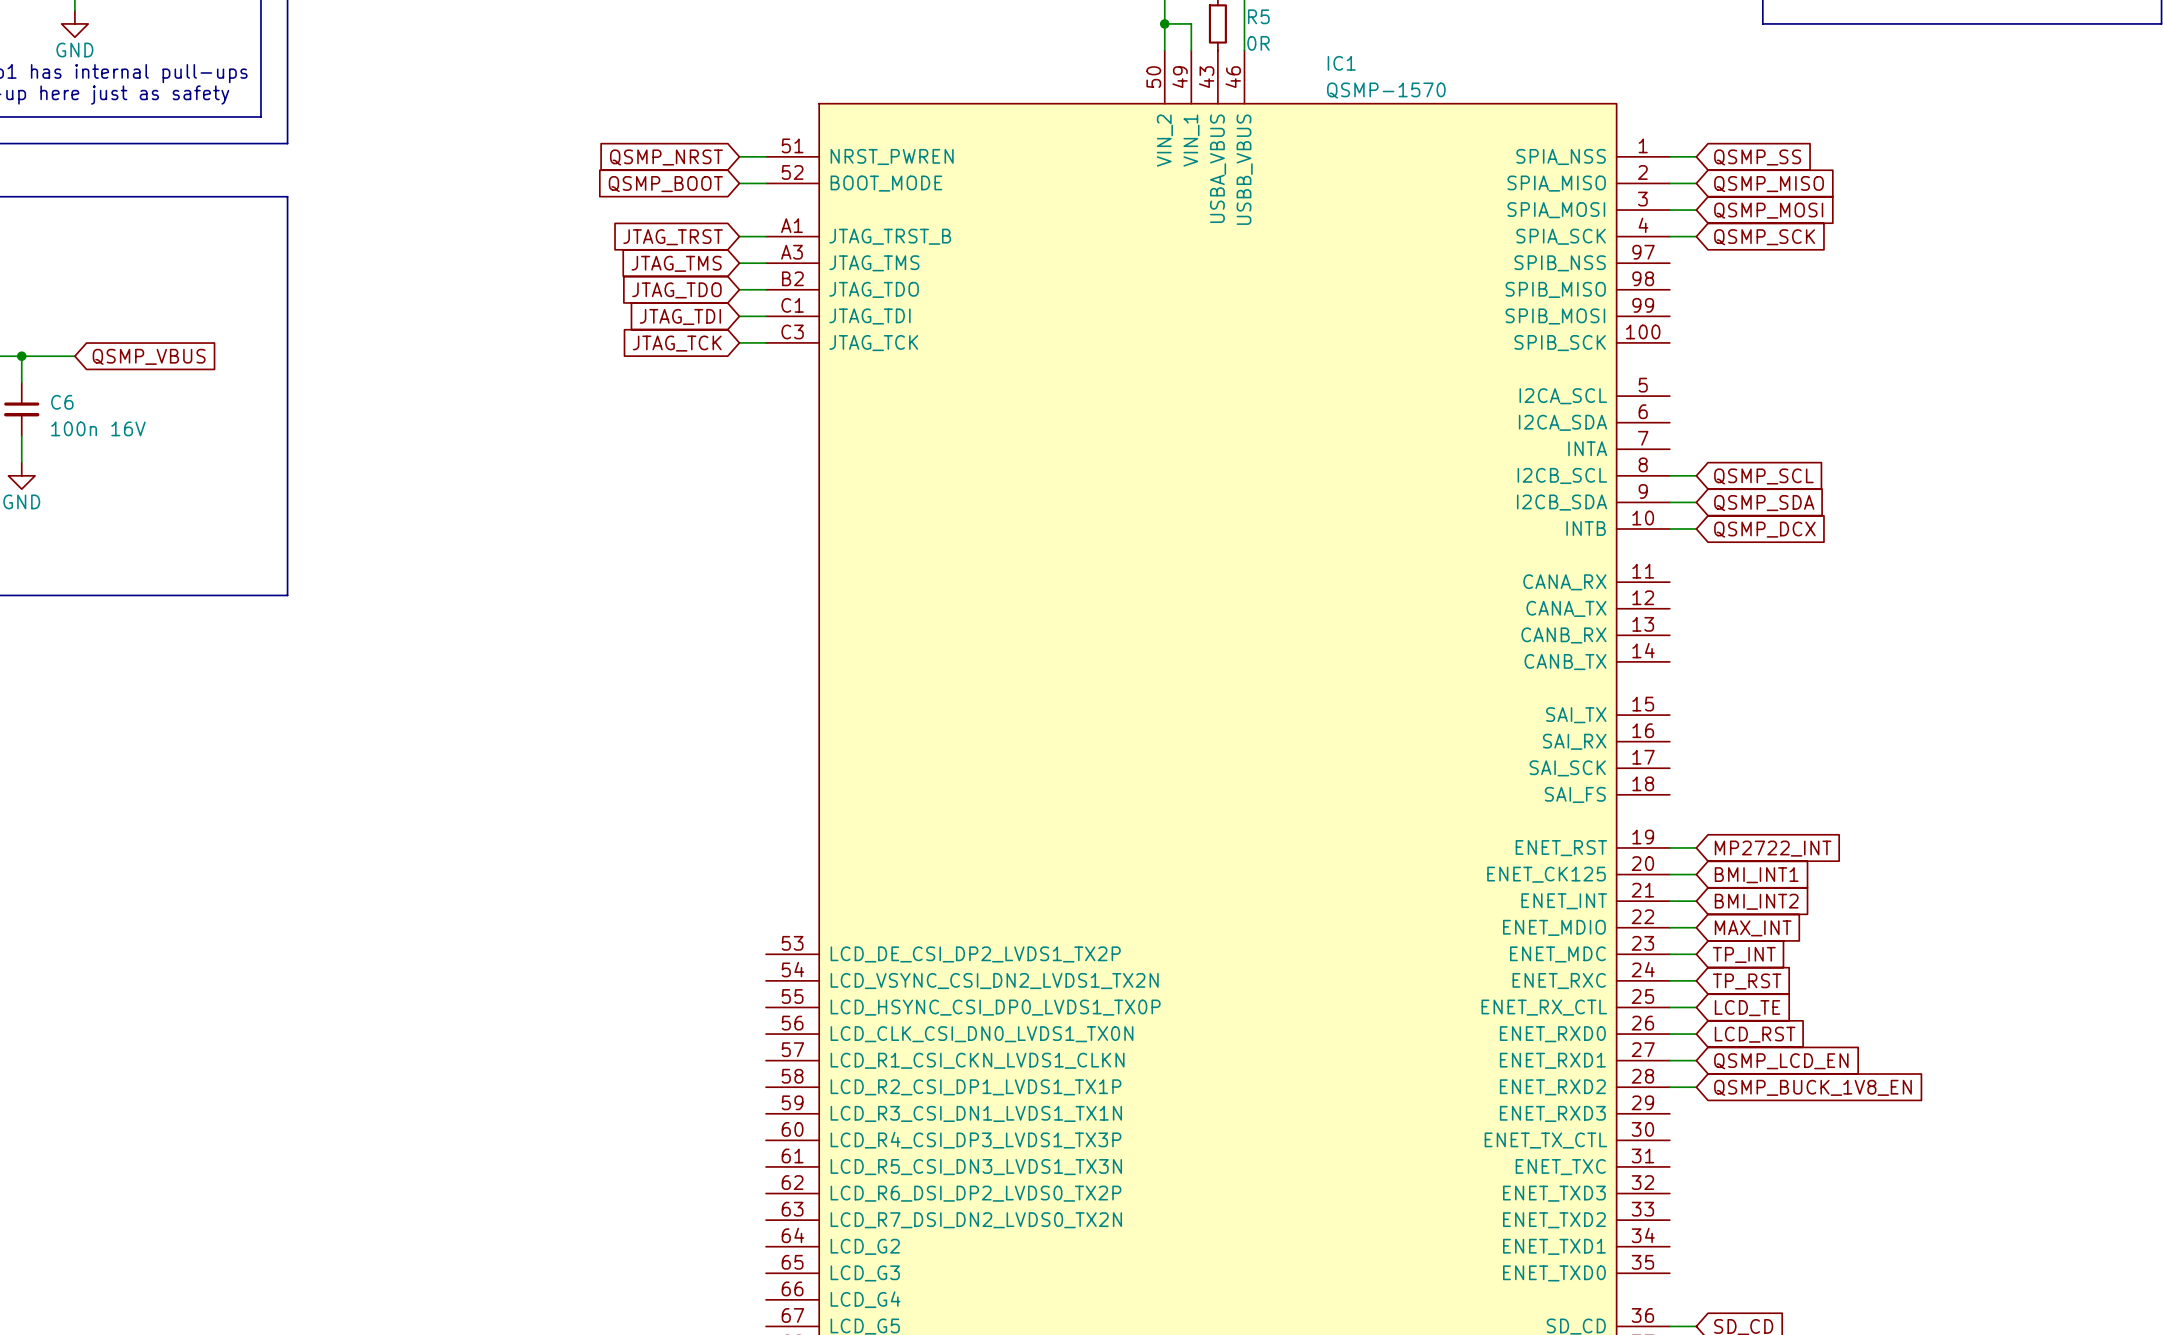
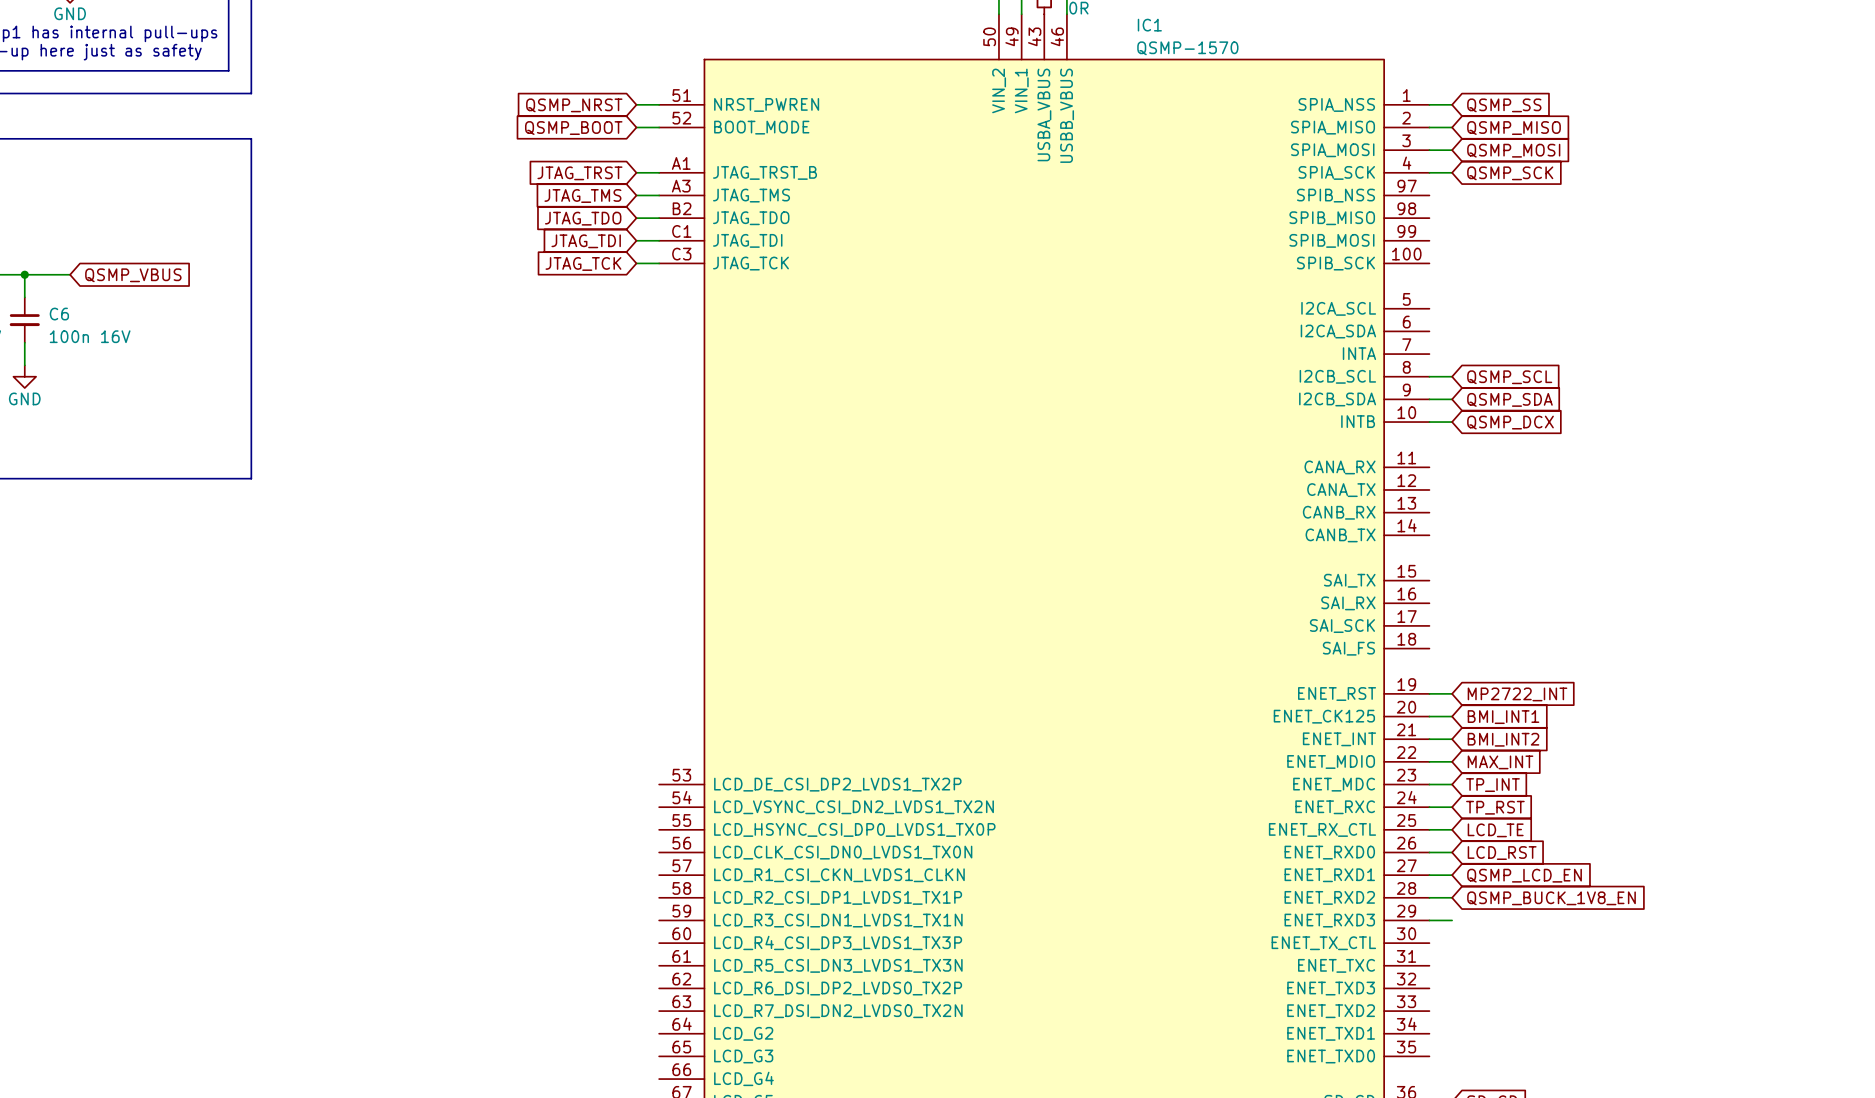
wire: none -> (1429, 920) (1452, 920)

